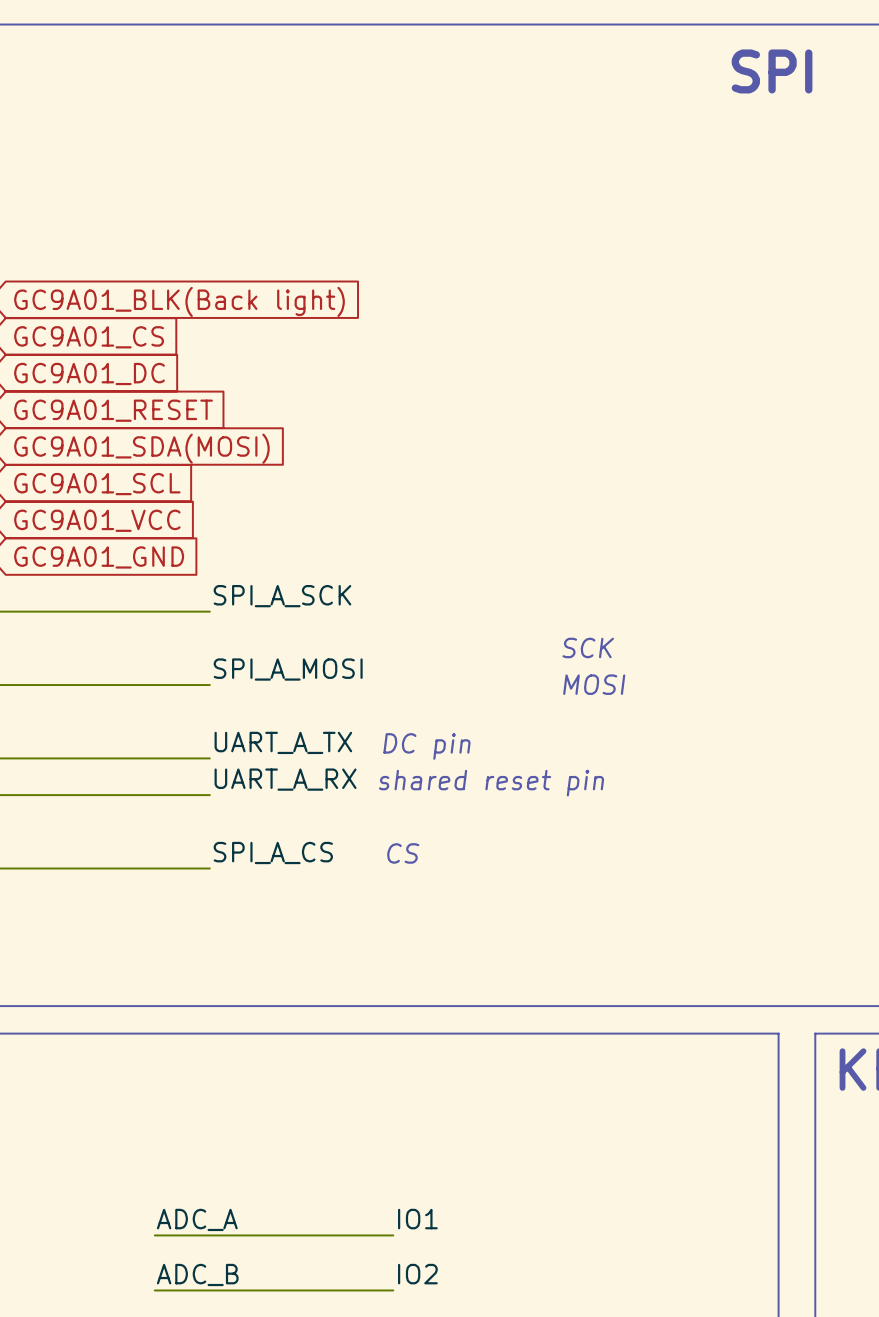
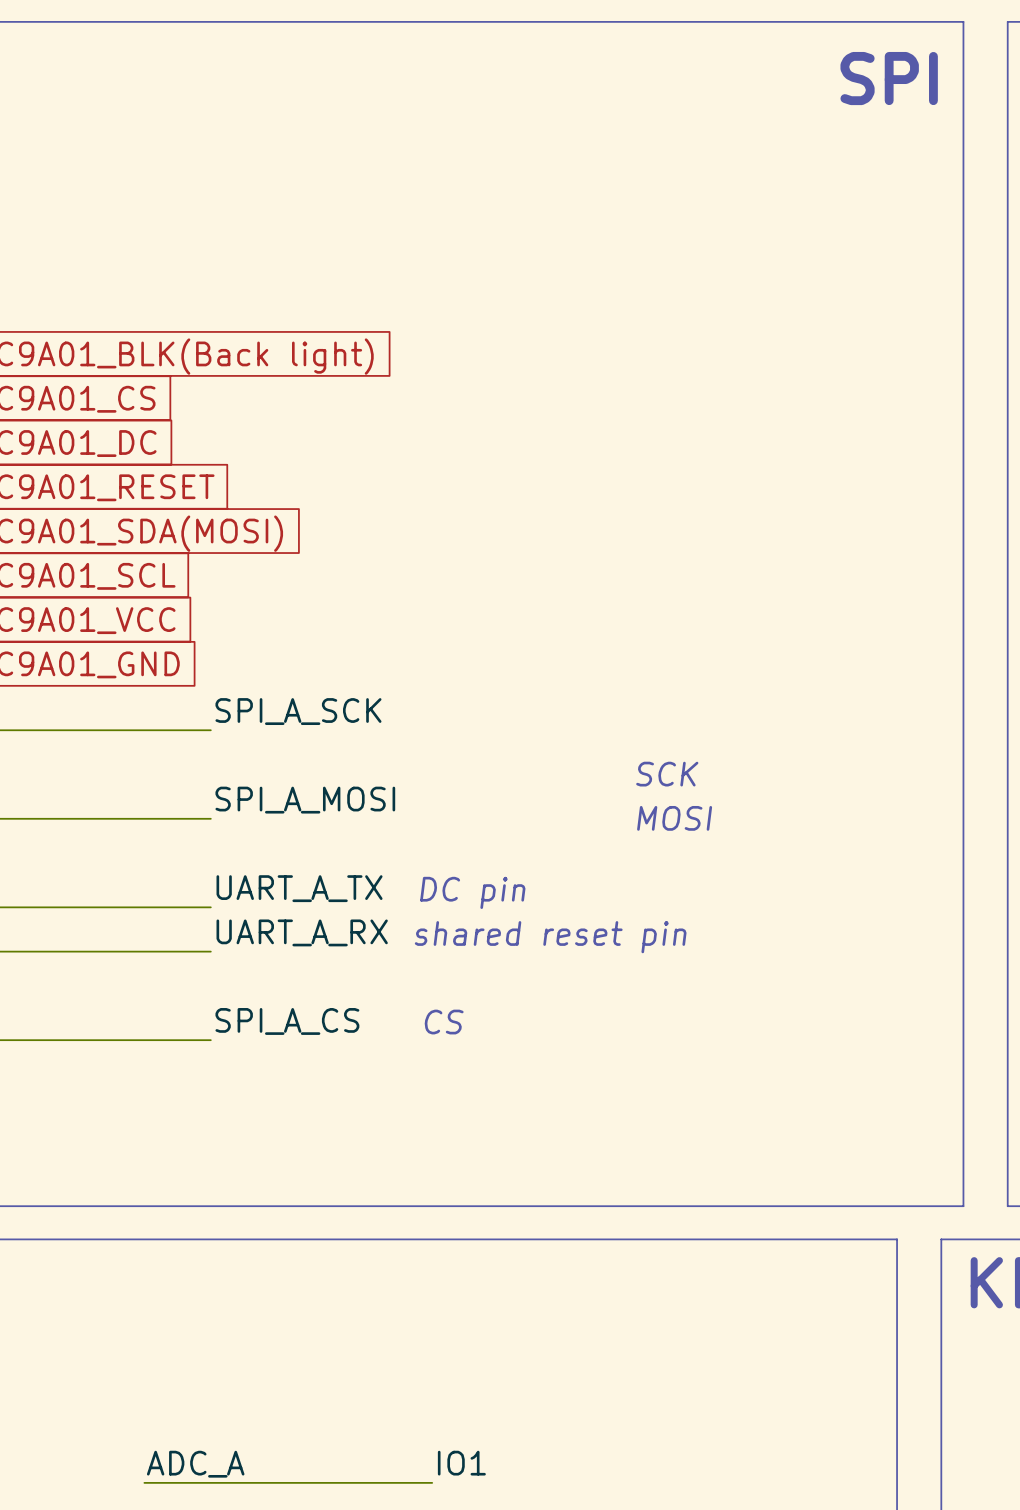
line: (833, 24) (870, 24) -> (963, 21) (963, 1206)
line: (833, 1006) (870, 1006) -> (1007, 21) (1007, 1206)

